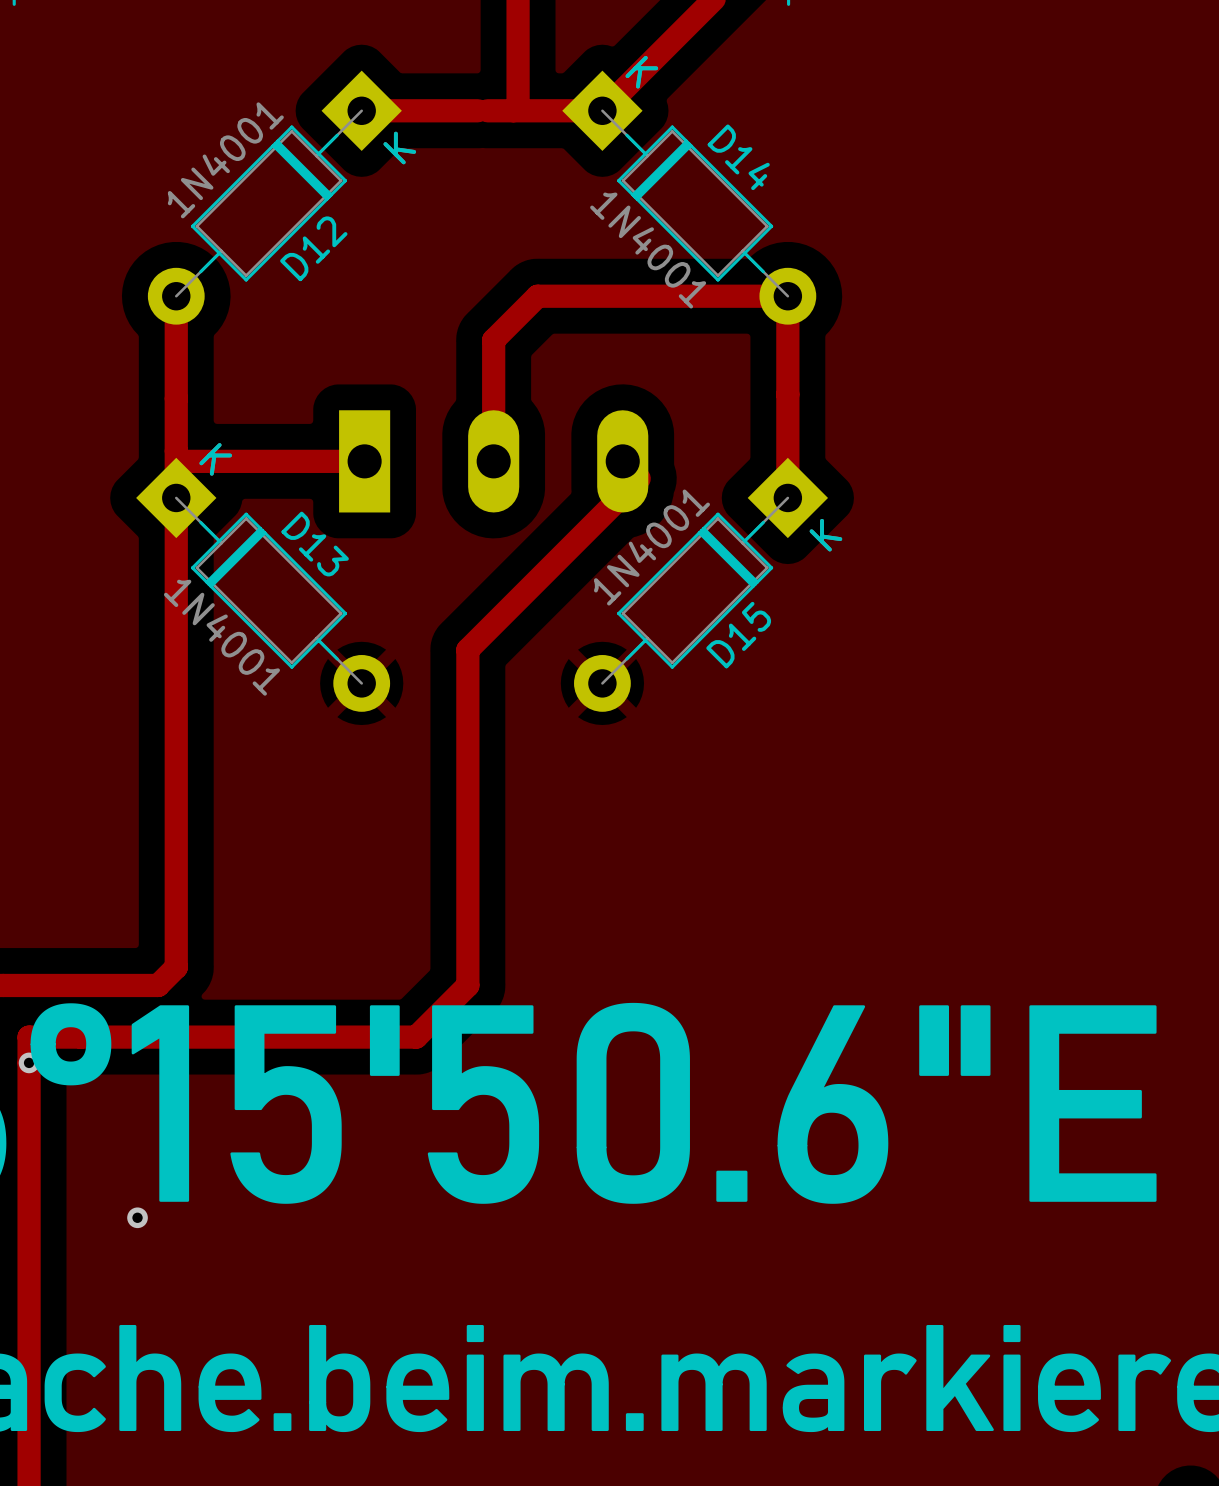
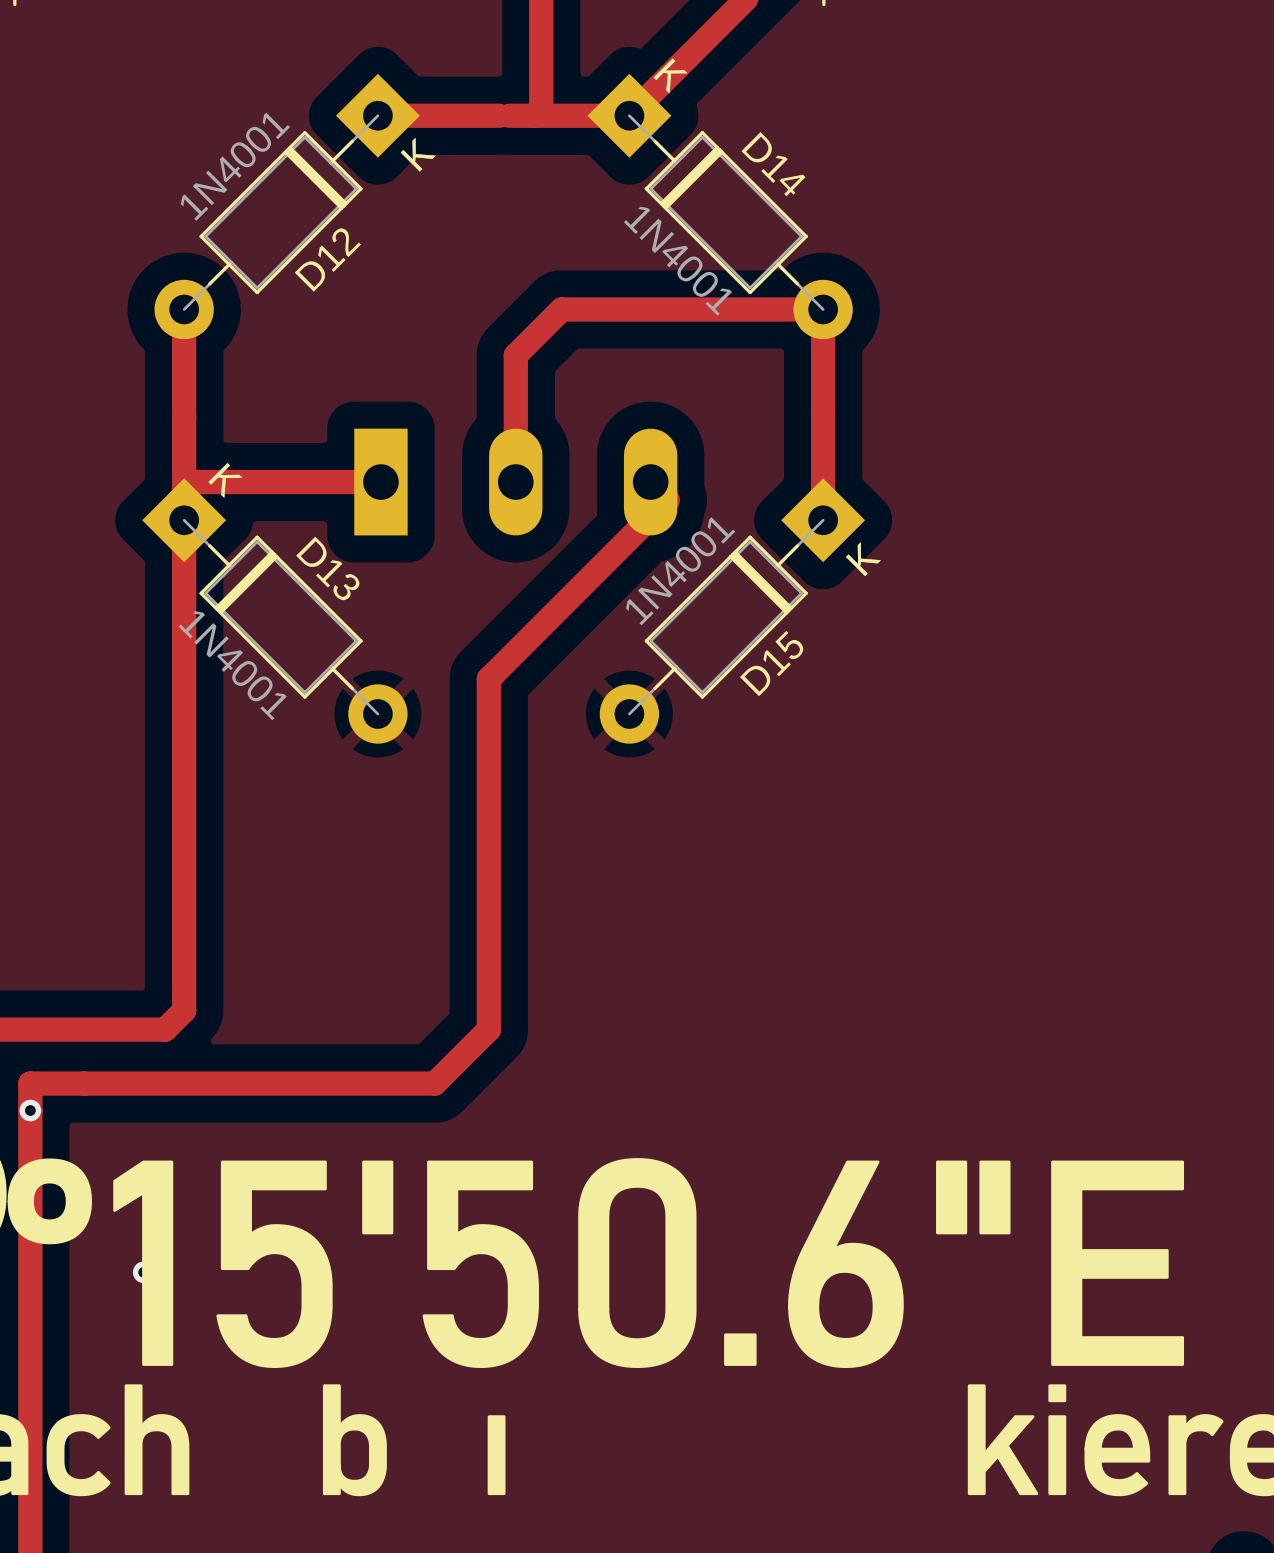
drawing: [230, 1005, 342, 1204] -> none
drawing: [427, 1005, 540, 1204] -> none
drawing: [919, 1005, 991, 1076] -> none
drawing position: (384, 1040) -> (377, 1197)
drawing position: (70, 1044) -> (49, 1201)
drawing position: (160, 1103) -> (143, 1263)
drawing position: (633, 1103) -> (637, 1263)
drawing position: (1092, 1103) -> (1117, 1263)
drawing position: (832, 1104) -> (845, 1264)
drawing: none -> [216, 1160, 333, 1368]
drawing: none -> [422, 1160, 539, 1368]
drawing: none -> [936, 1160, 1011, 1235]
drawing position: (731, 1186) -> (740, 1349)
drawing: [386, 1324, 917, 1433] -> none
drawing: [198, 1353, 292, 1433] -> none

